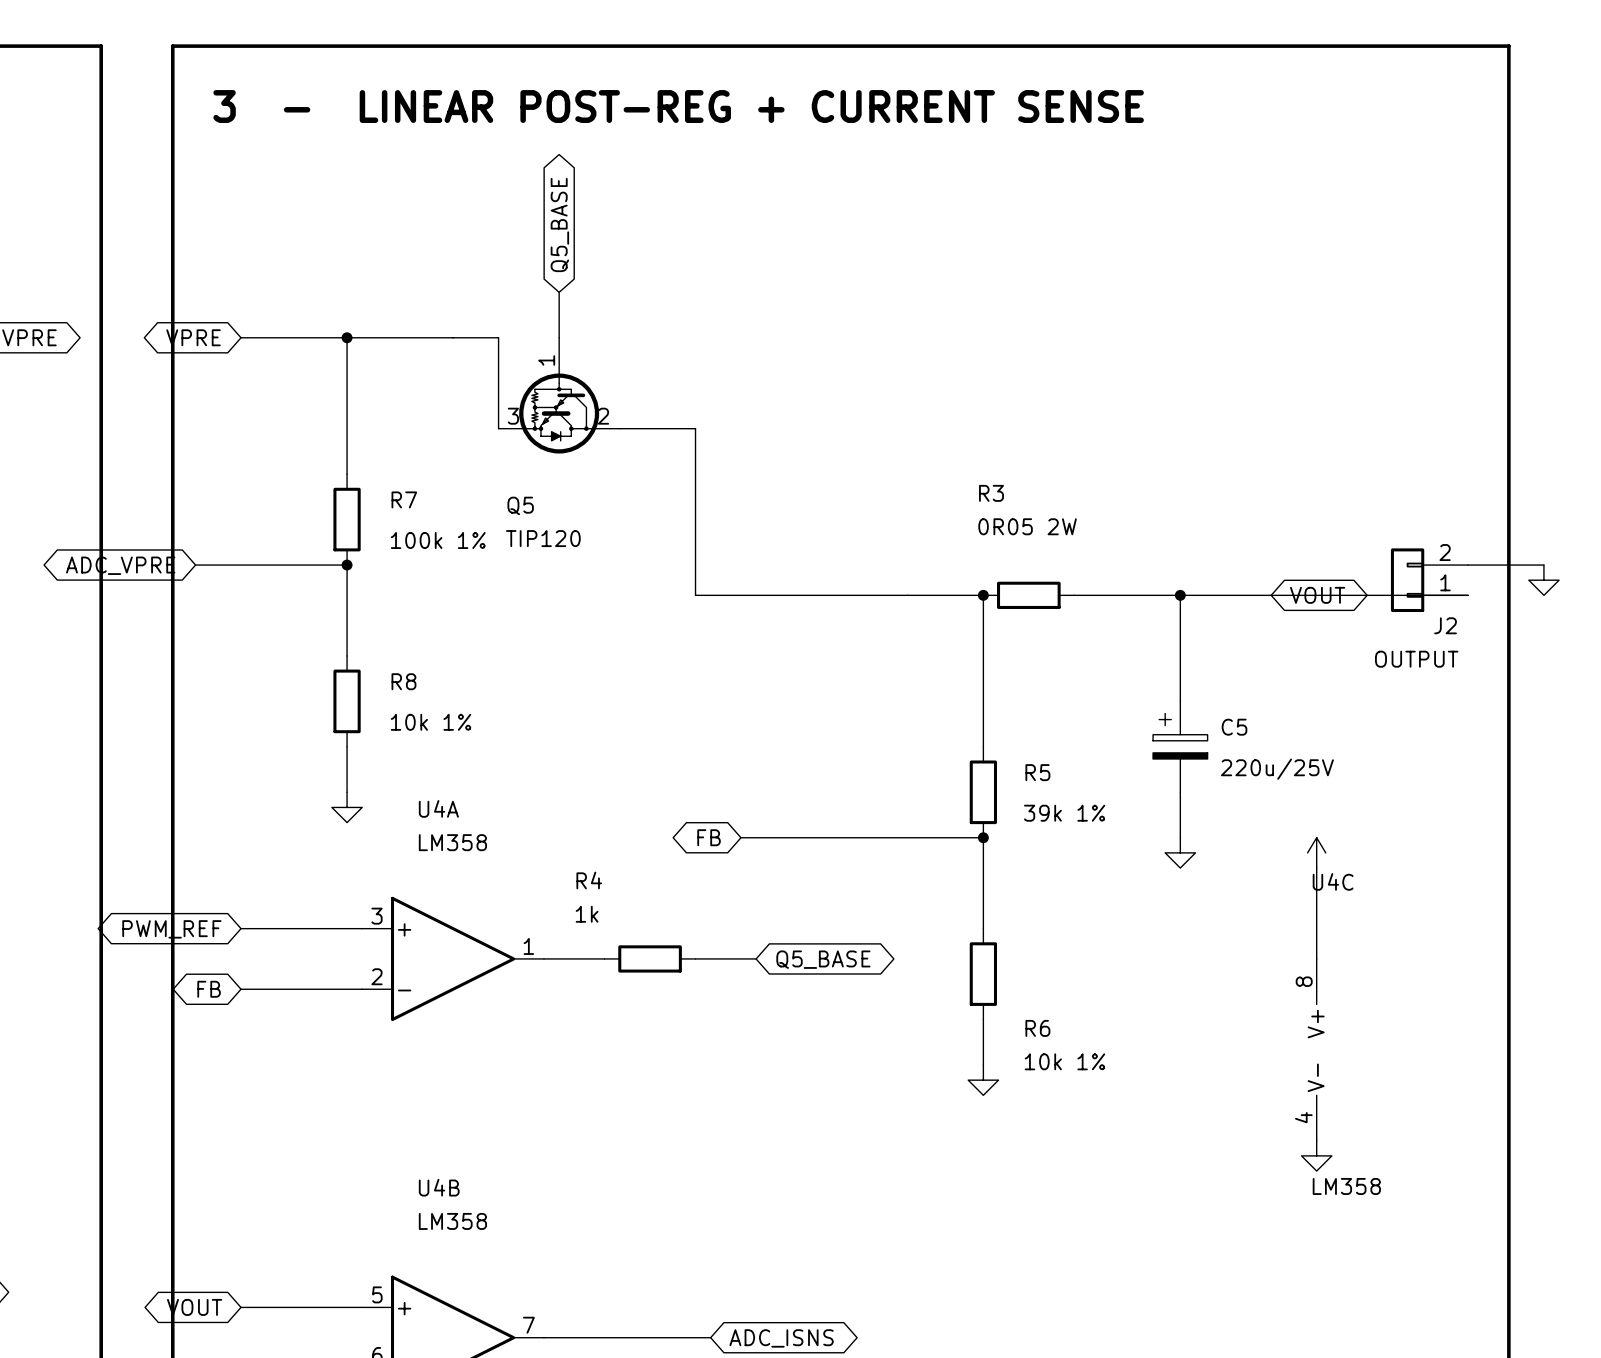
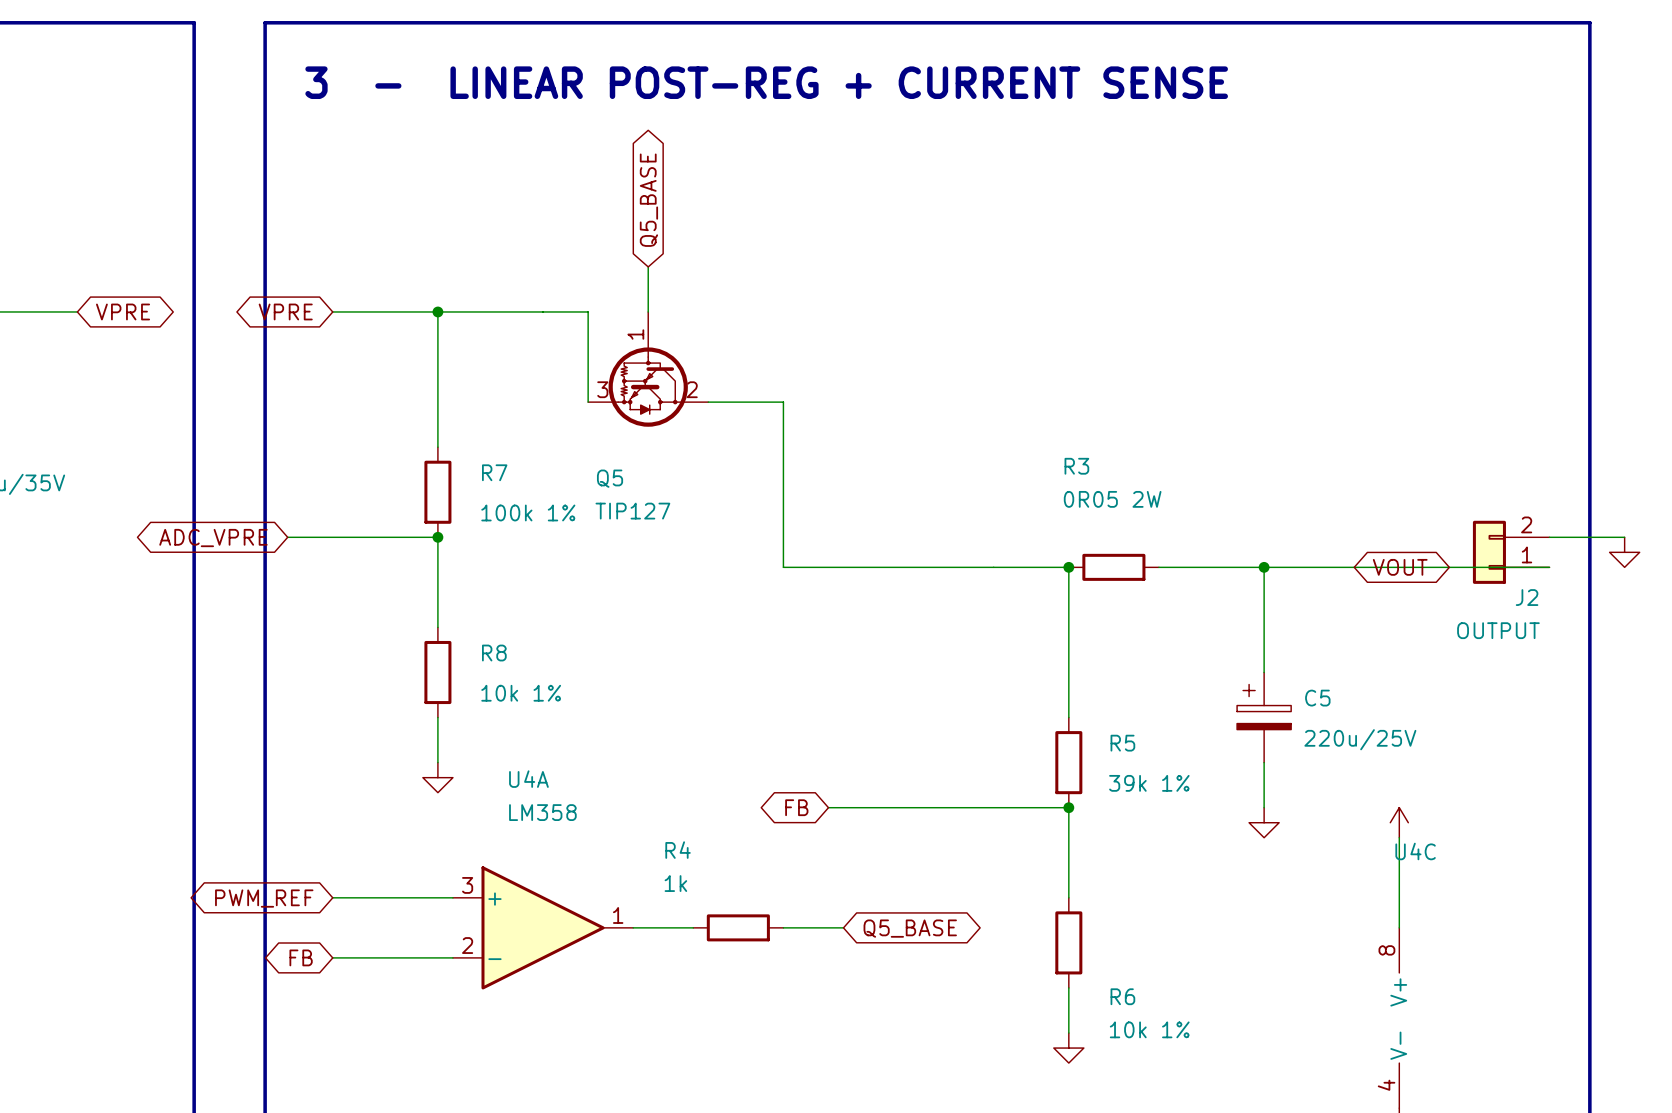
Q5 value: TIP120 (543, 538) -> TIP127 (632, 511)

